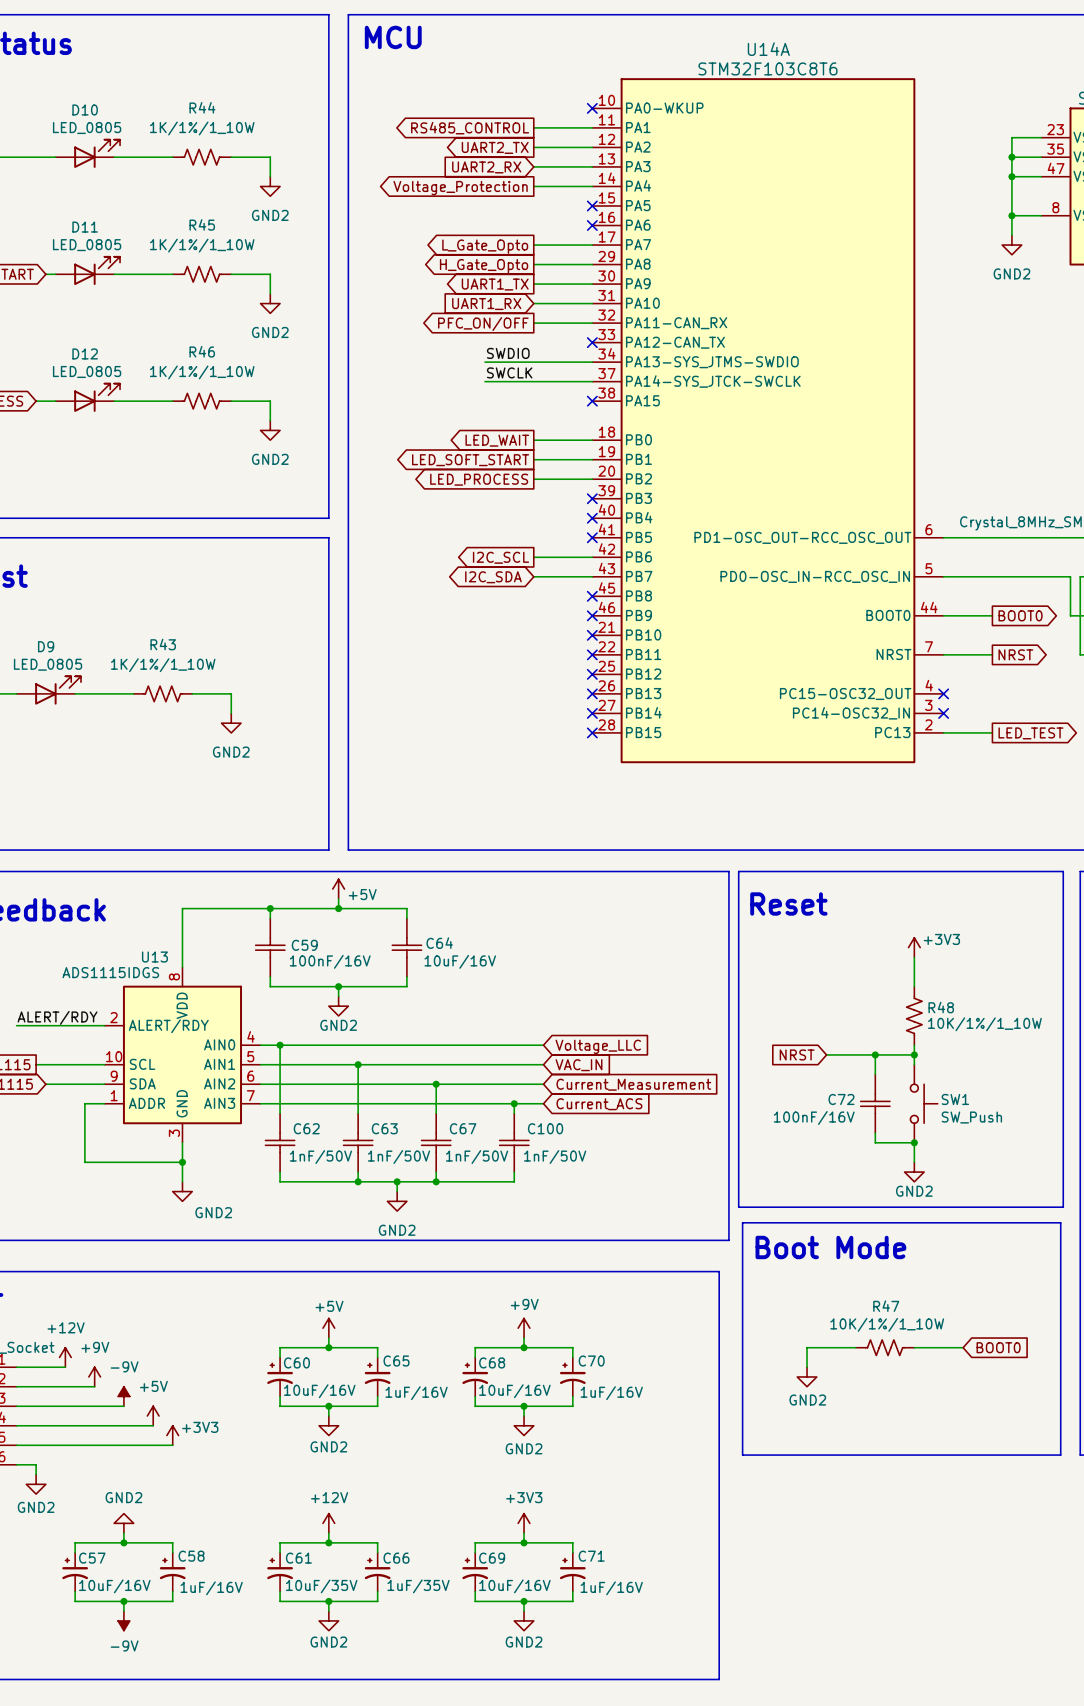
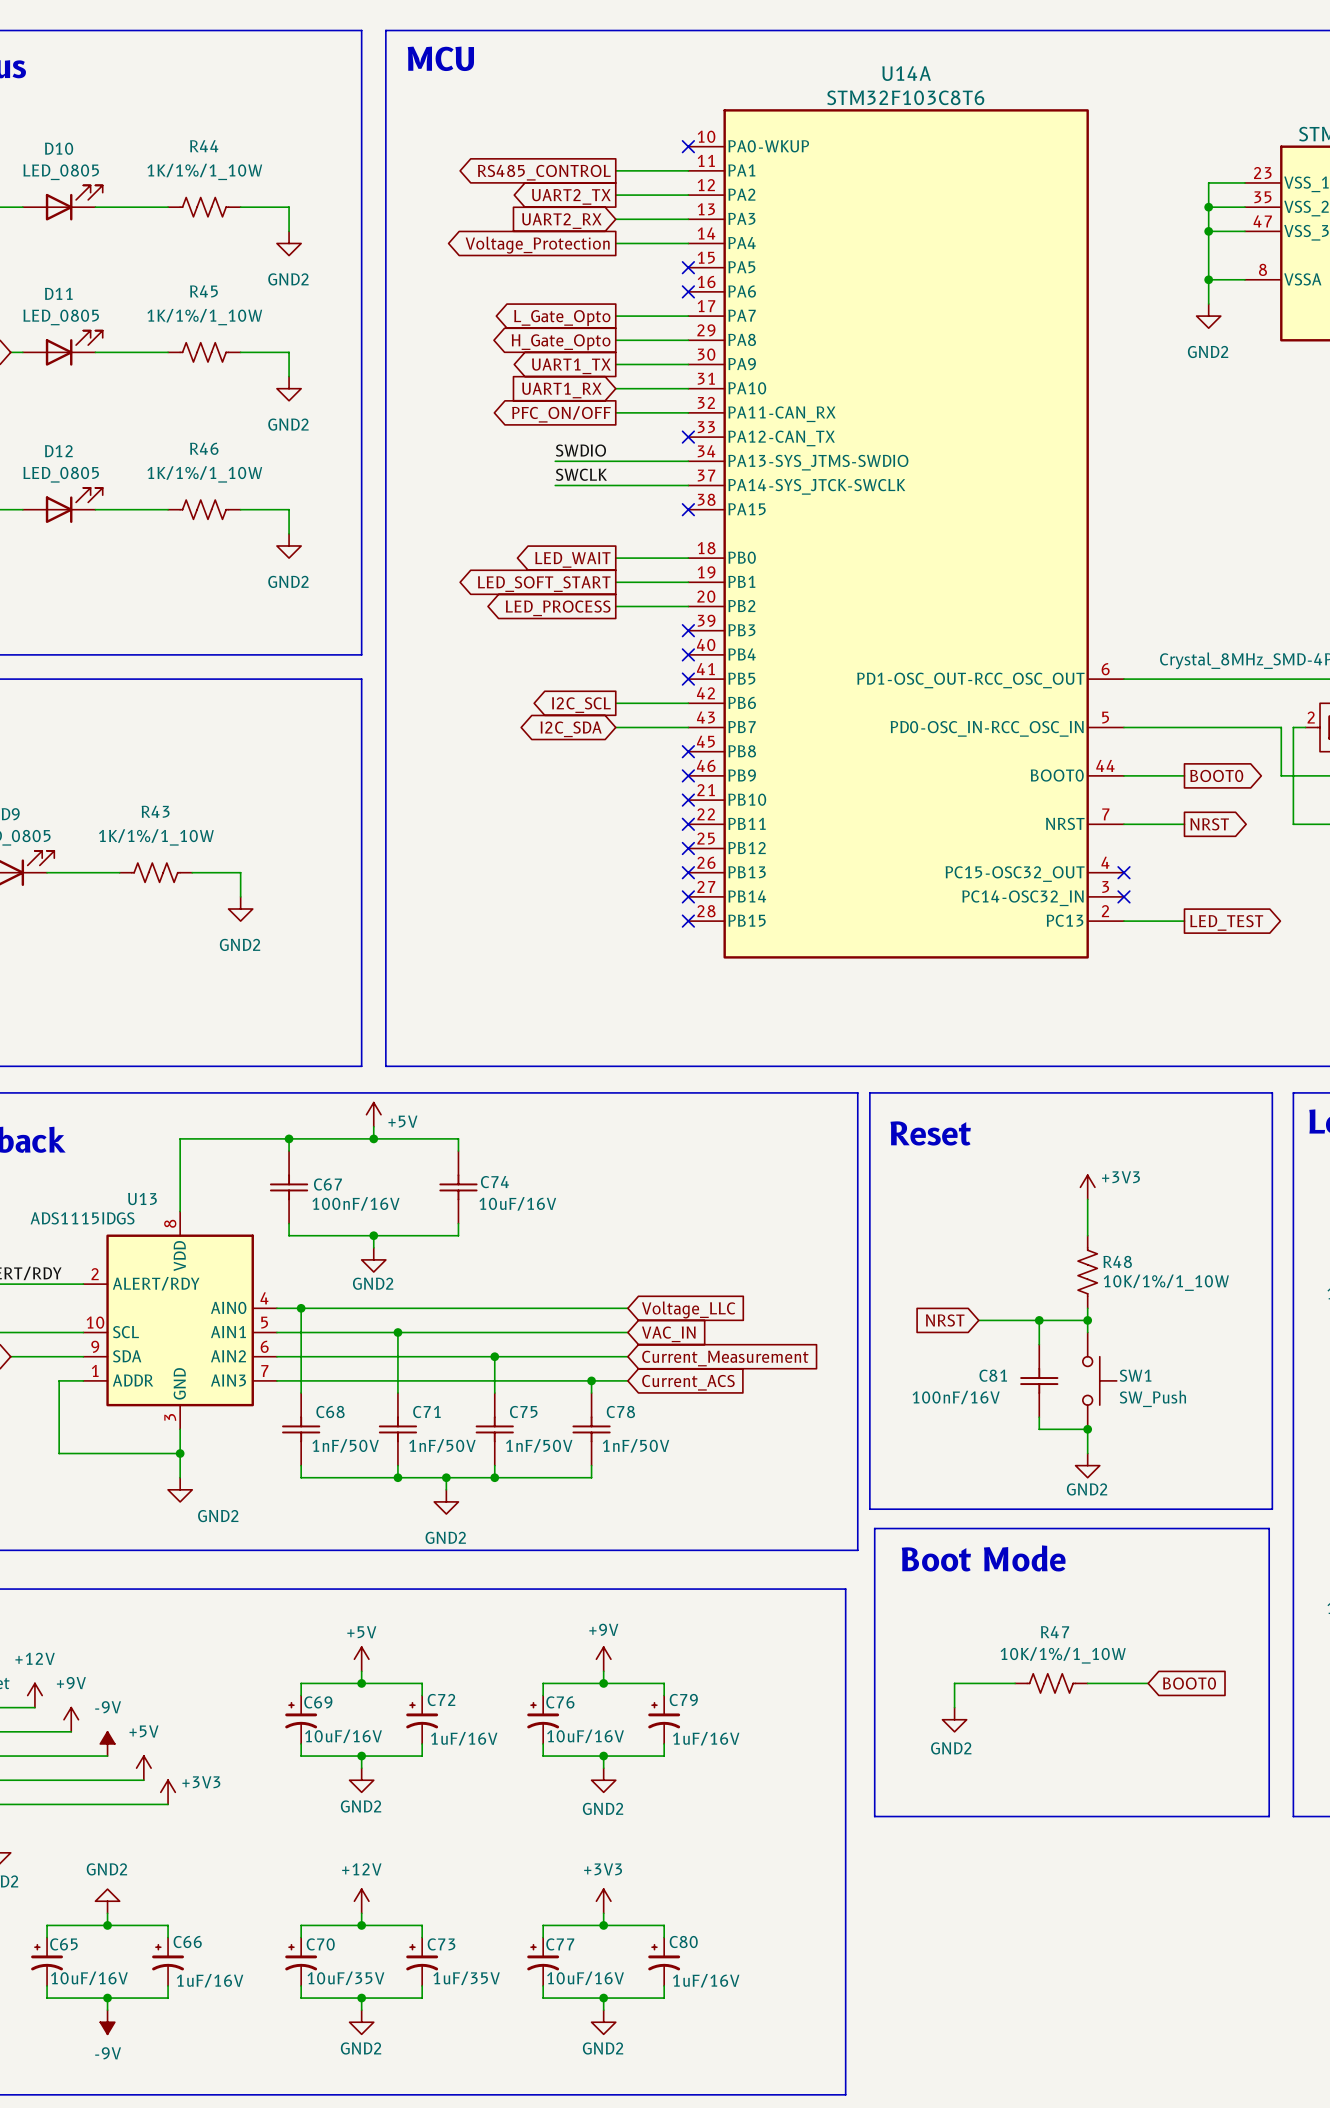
C64 name: C64 (439, 943) -> C74 (494, 1182)
C59 name: C59 (304, 945) -> C67 (327, 1184)
C72 name: C72 (841, 1099) -> C81 (993, 1375)
C62 name: C62 (306, 1128) -> C68 (330, 1412)
C63 name: C63 (384, 1128) -> C71 (426, 1411)
C67 name: C67 (463, 1128) -> C75 (523, 1412)
C100 name: C100 (545, 1128) -> C78 (620, 1412)
C65 name: C65 (396, 1361) -> C72 (441, 1700)
C70 name: C70 (591, 1361) -> C79 (683, 1700)
C60 name: C60 (296, 1362) -> C69 (318, 1702)
C68 name: C68 (492, 1362) -> C76 (560, 1702)
C58 name: C58 (191, 1556) -> C66 (187, 1942)
C71 name: C71 (591, 1556) -> C80 (683, 1942)
C57 name: C57 (92, 1558) -> C65 (63, 1944)
C61 name: C61 (298, 1558) -> C70 (320, 1944)
C66 name: C66 (396, 1558) -> C73 (441, 1944)
C69 name: C69 (492, 1558) -> C77 (560, 1944)

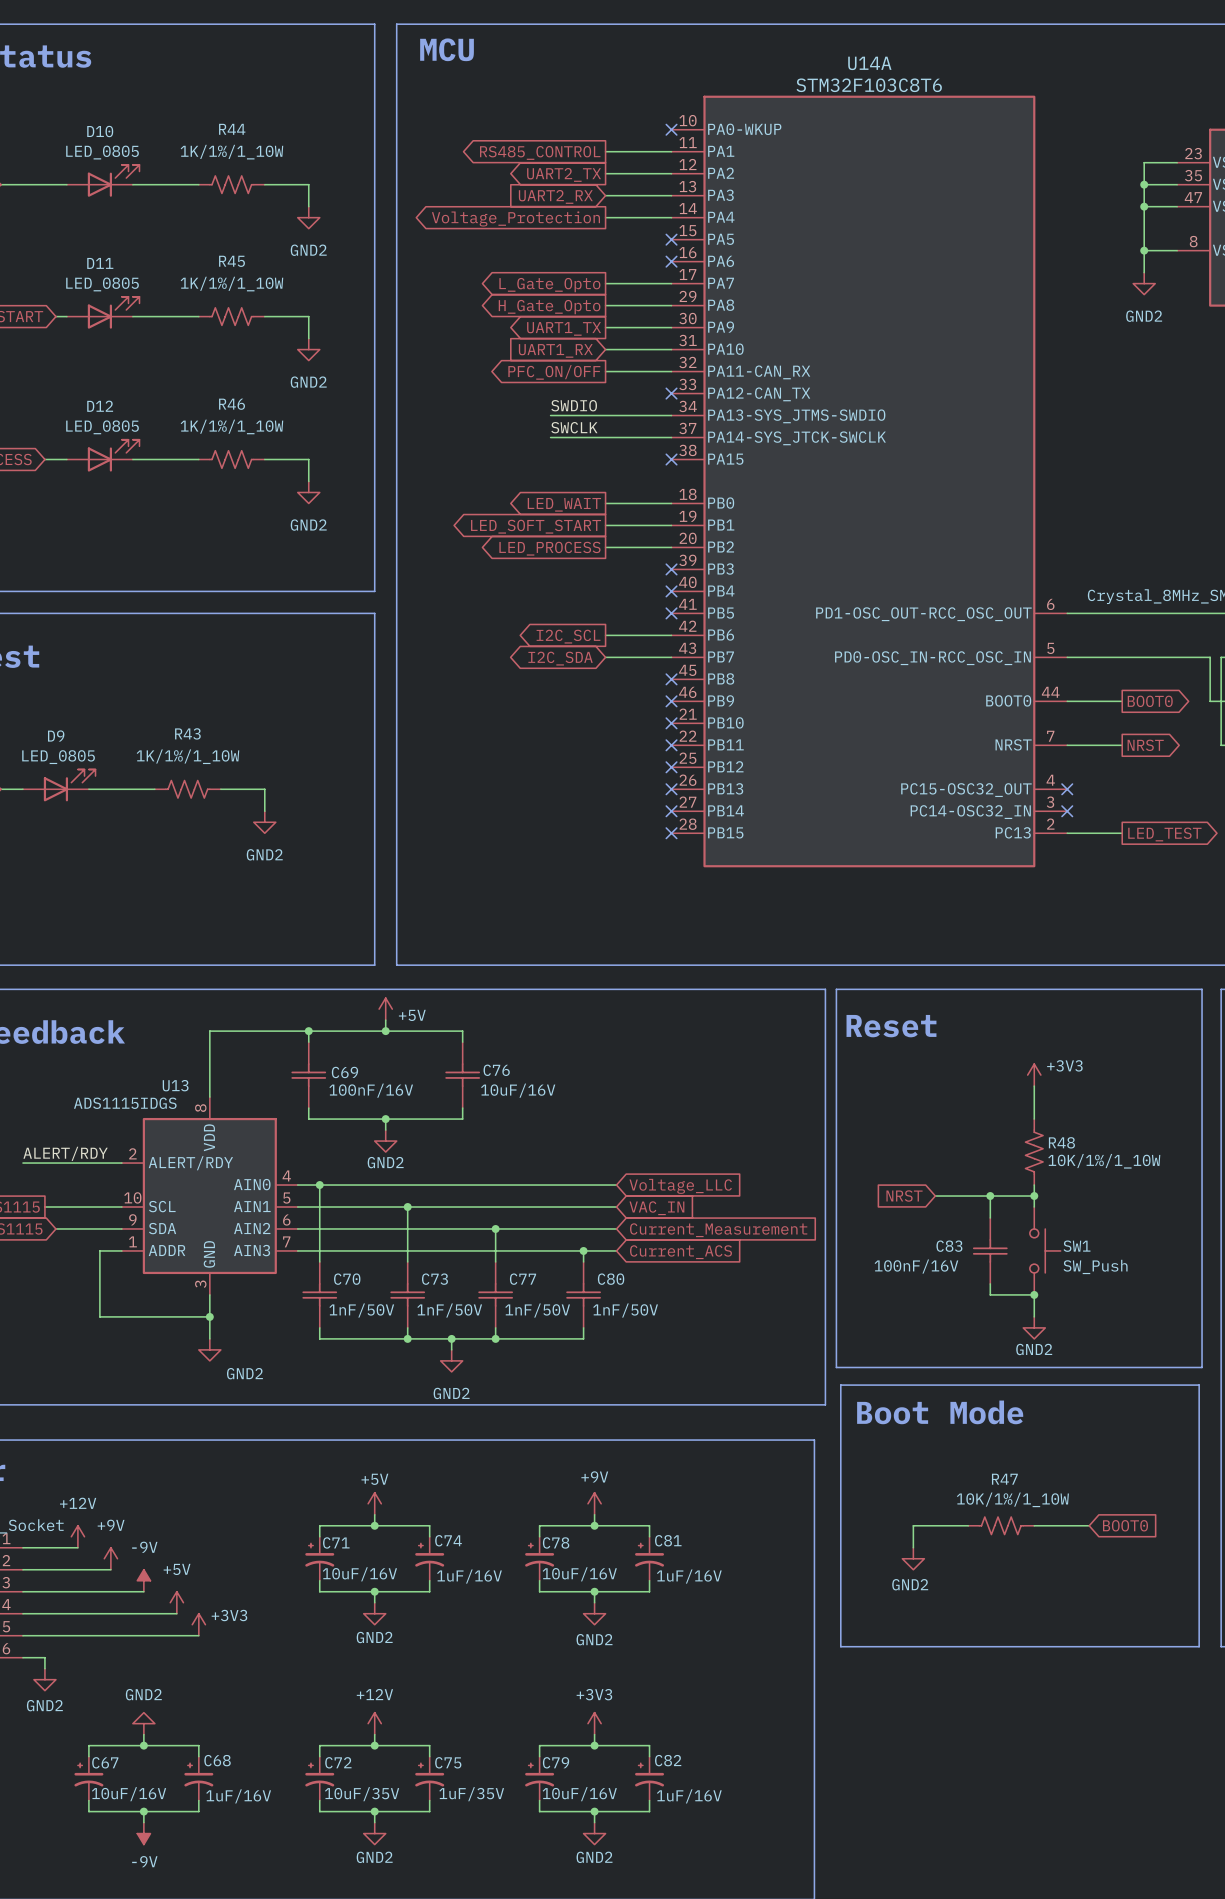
C74 name: C74 (494, 1182) -> C76 (496, 1070)
C67 name: C67 (327, 1184) -> C69 (344, 1072)
C81 name: C81 (993, 1375) -> C83 (949, 1246)
C71 name: C71 (426, 1411) -> C73 (434, 1279)
C68 name: C68 (330, 1412) -> C70 (347, 1279)
C75 name: C75 (523, 1412) -> C77 (523, 1279)
C78 name: C78 (620, 1412) -> C80 (611, 1279)
C72 name: C72 (441, 1700) -> C74 (448, 1540)
C79 name: C79 (683, 1700) -> C81 (668, 1540)
C69 name: C69 (318, 1702) -> C71 (336, 1542)
C76 name: C76 (560, 1702) -> C78 (556, 1542)
C66 name: C66 (187, 1942) -> C68 (217, 1760)
C80 name: C80 (683, 1942) -> C82 (668, 1760)
C65 name: C65 (63, 1944) -> C67 (105, 1762)
C70 name: C70 (320, 1944) -> C72 (338, 1762)
C73 name: C73 (441, 1944) -> C75 (448, 1762)
C77 name: C77 (560, 1944) -> C79 (556, 1762)

